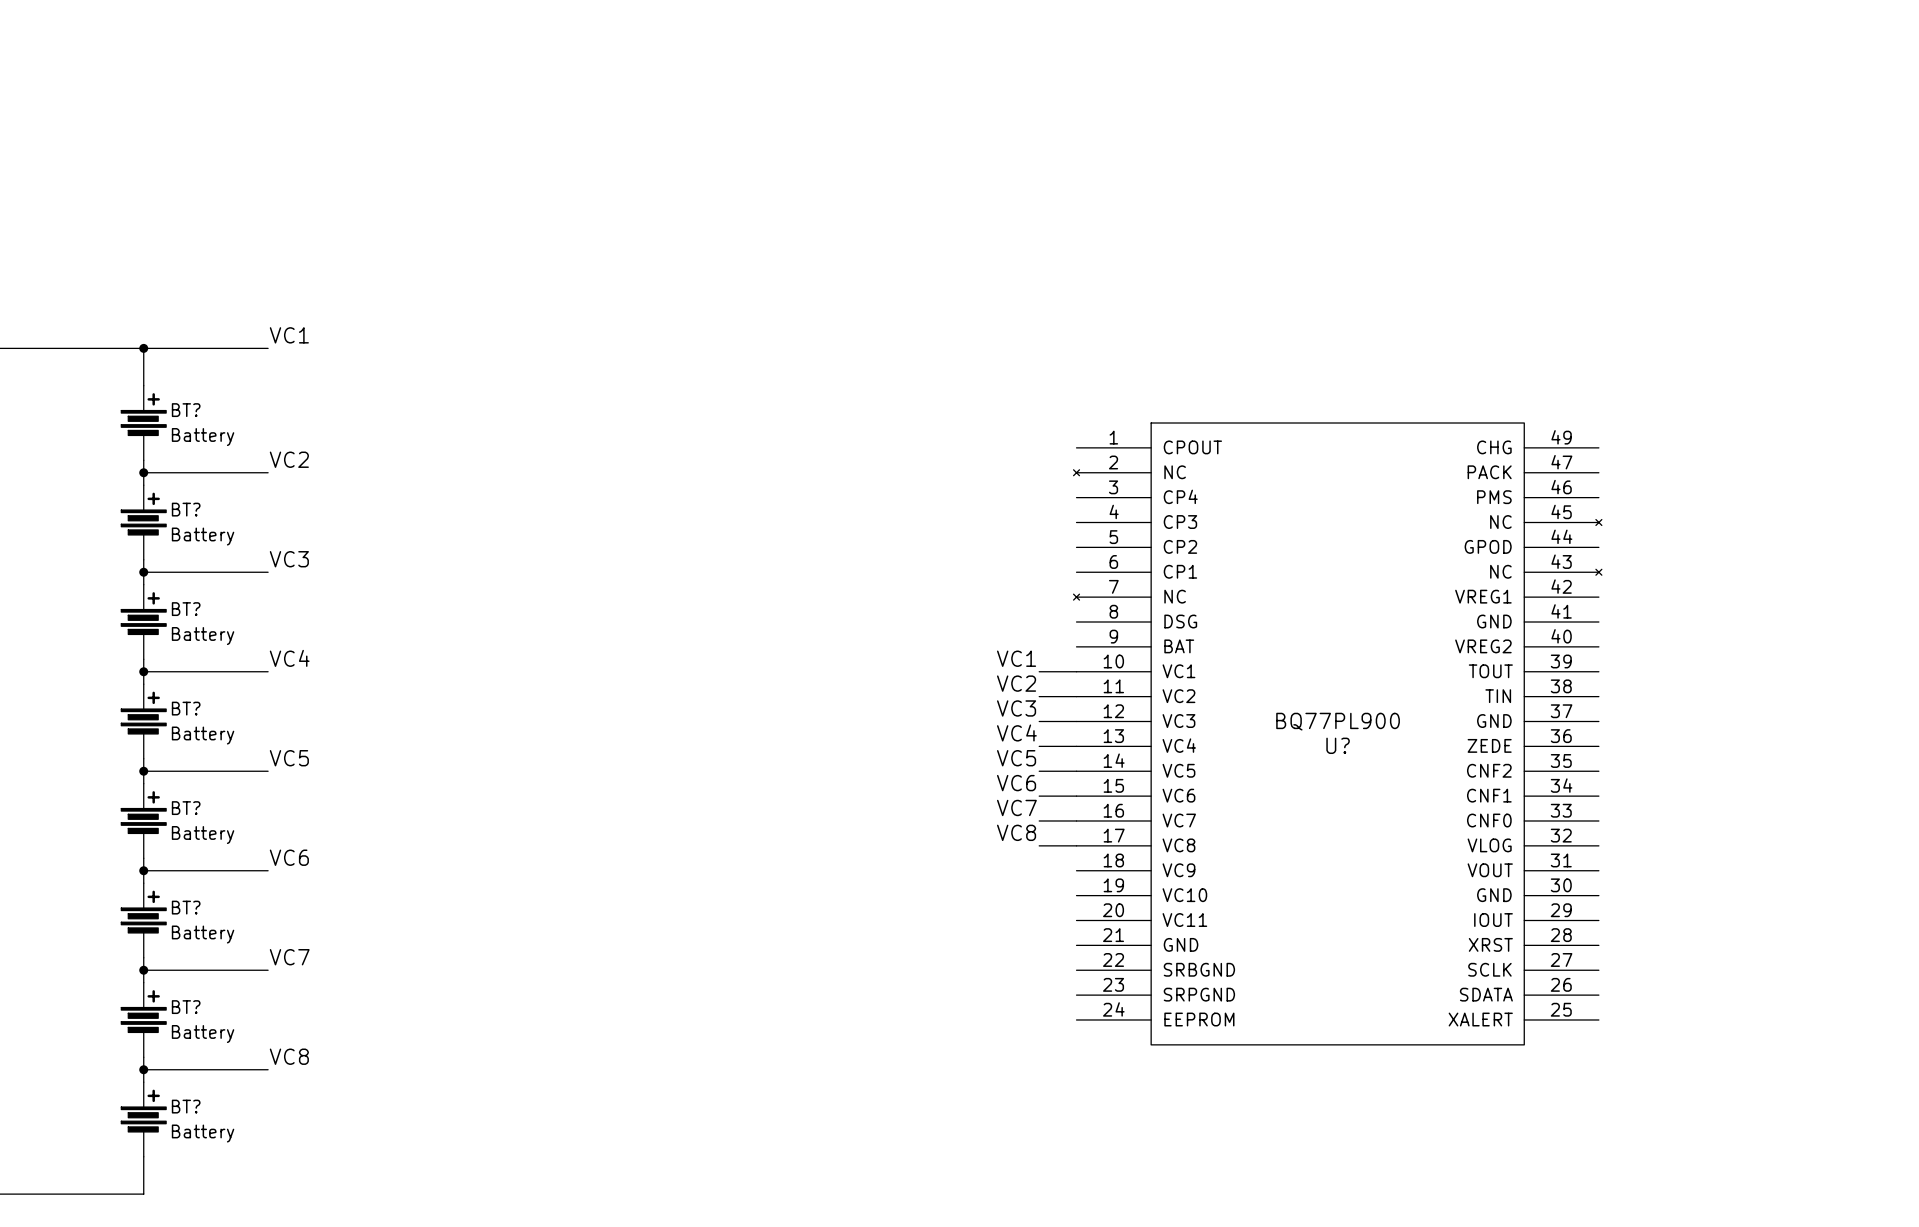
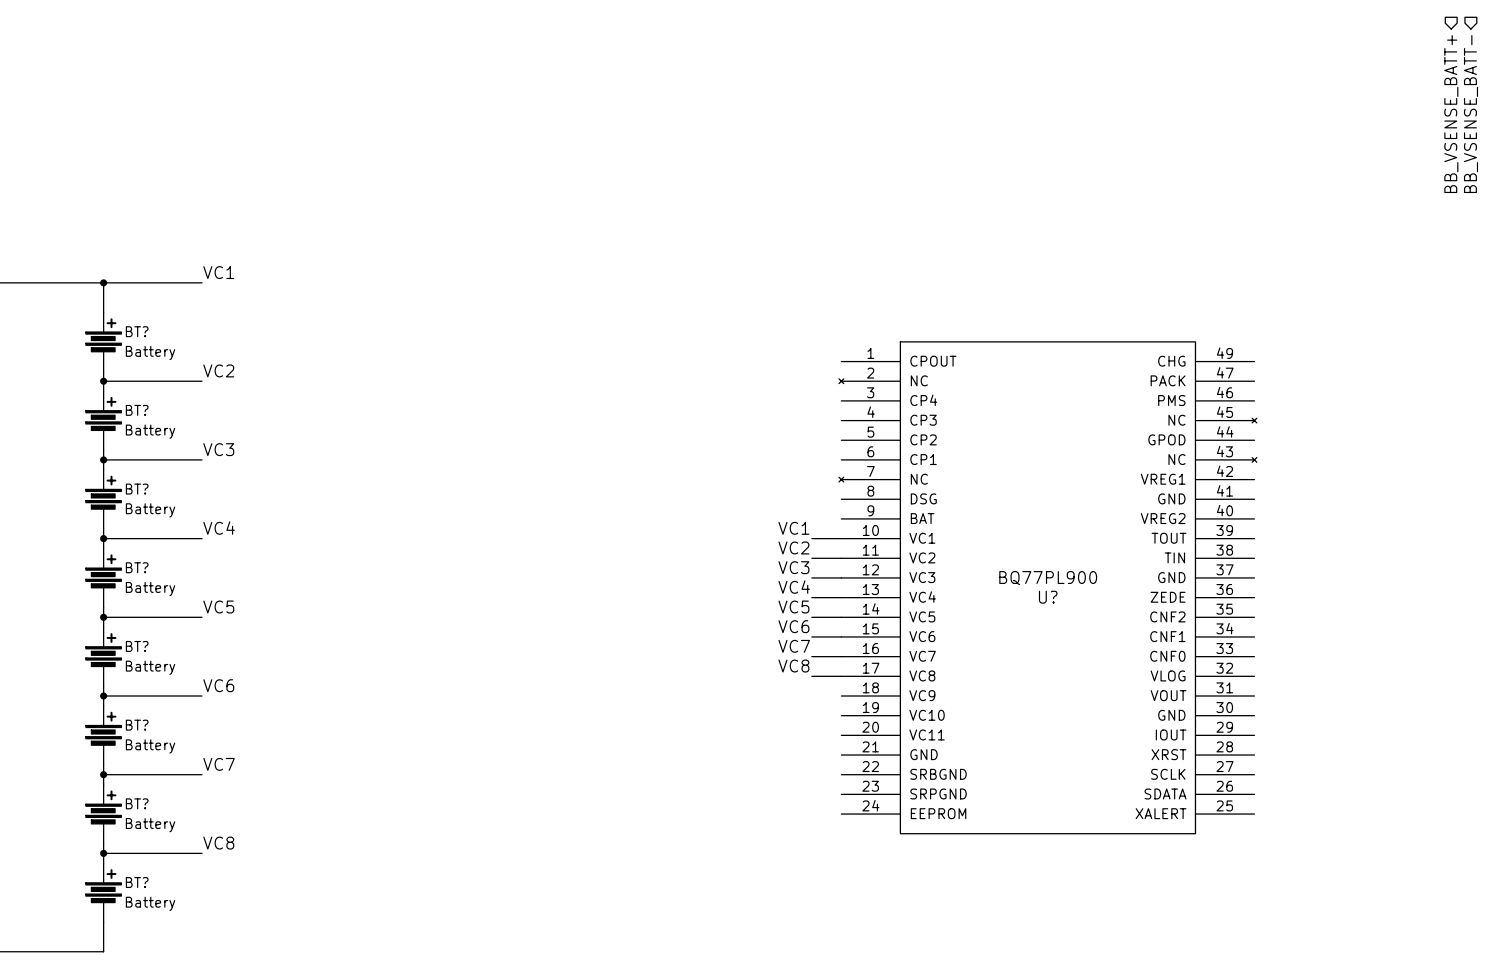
hierarchical label: none -> BB_VSENSE_BATT+ (1451, 114)
hierarchical label: none -> BB_VSENSE_BATT- (1471, 114)

